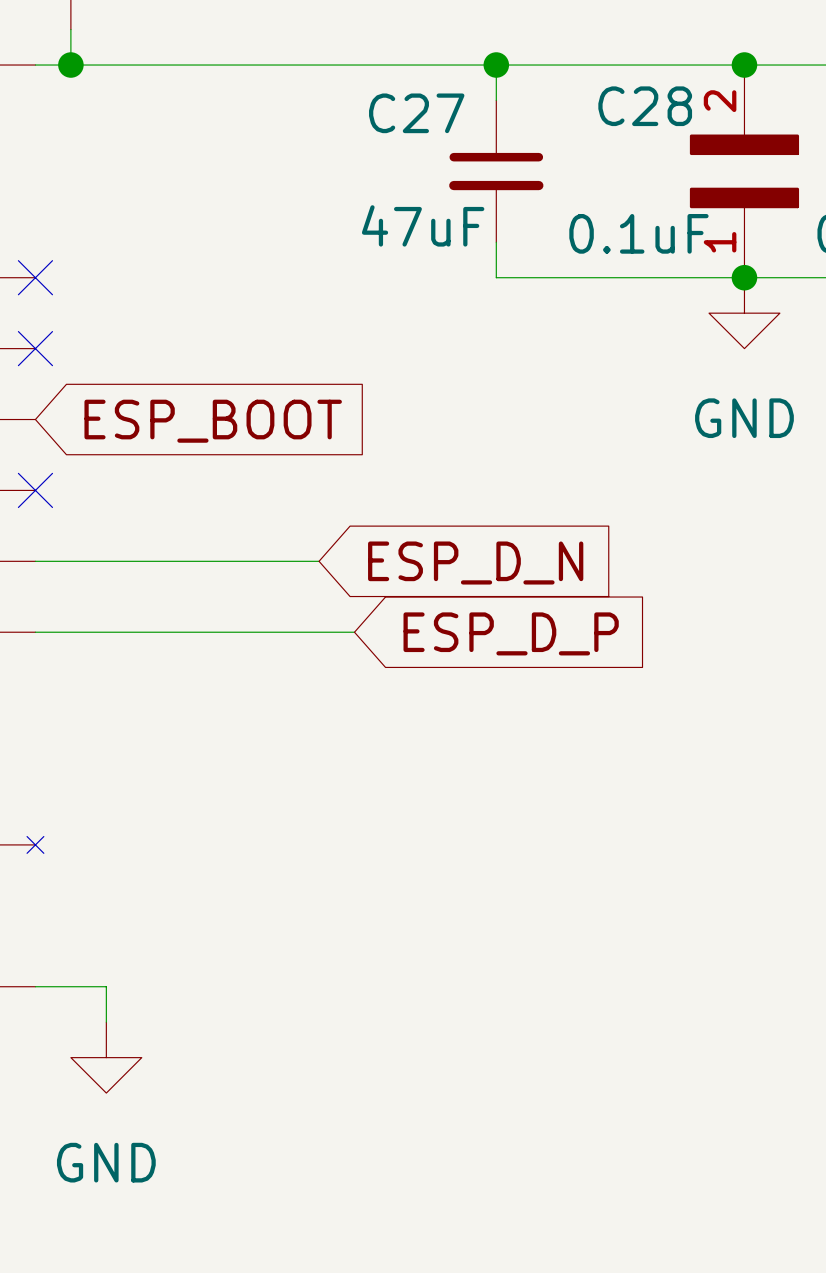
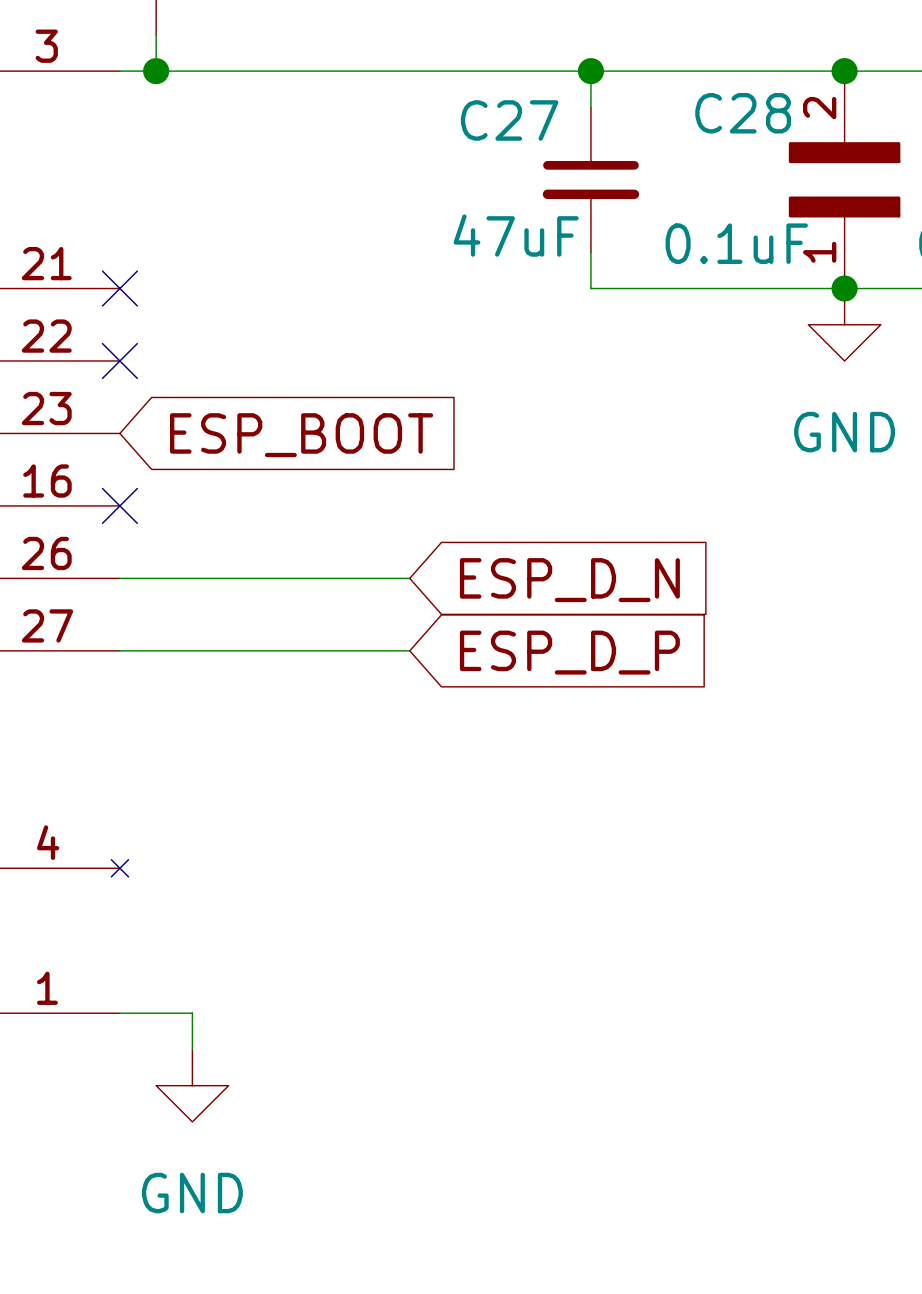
wire: (319, 632) (354, 632) -> none
global label position: ESP_D_P (511, 633) -> ESP_D_P (569, 652)

